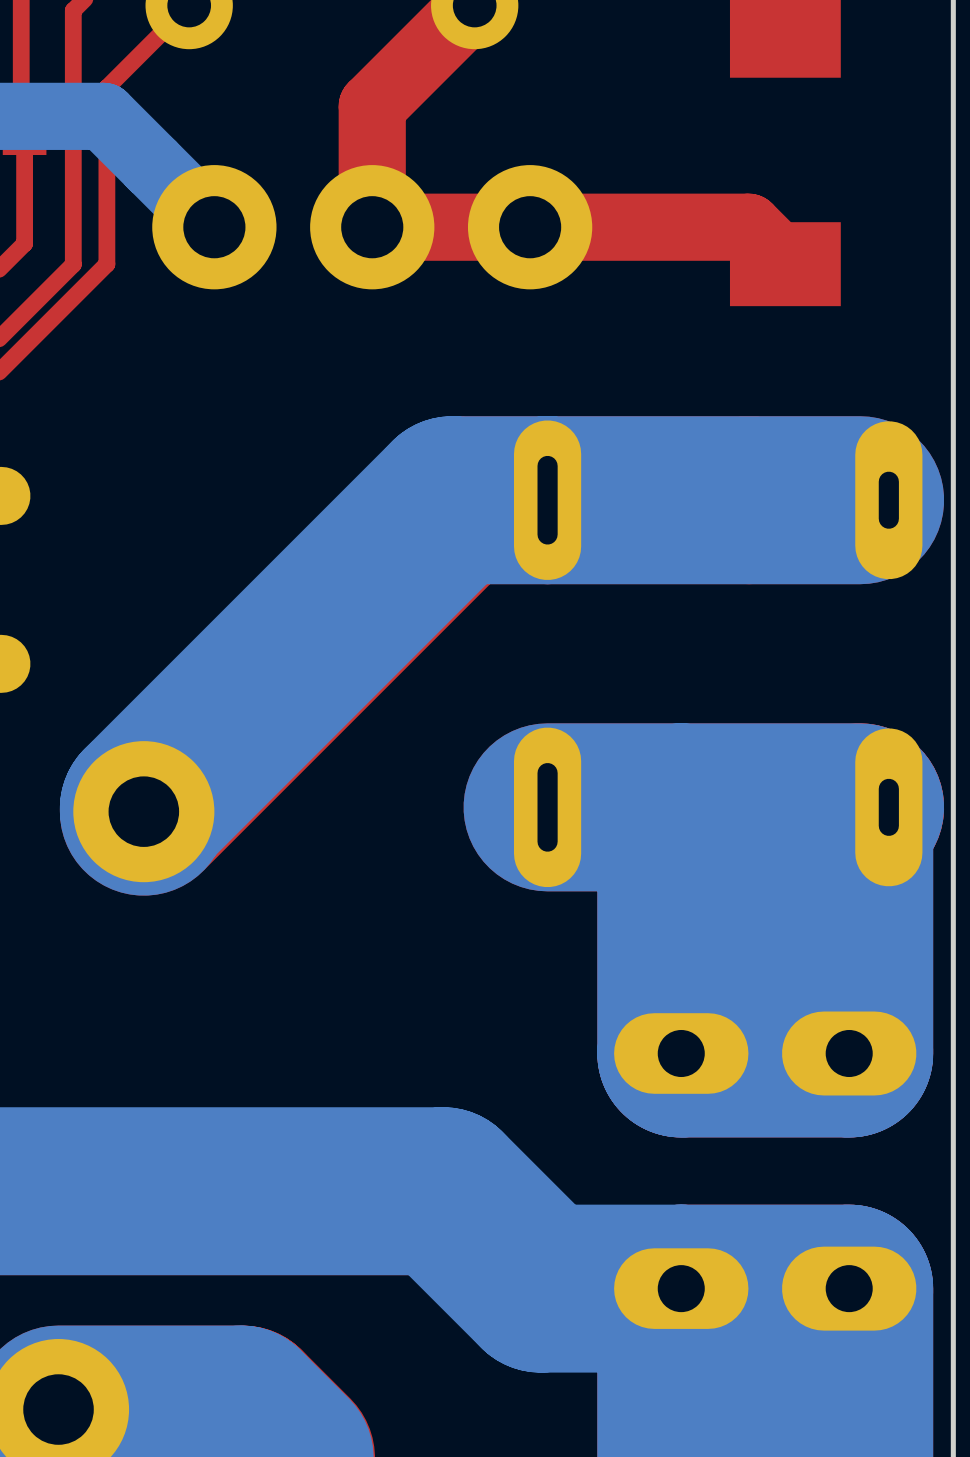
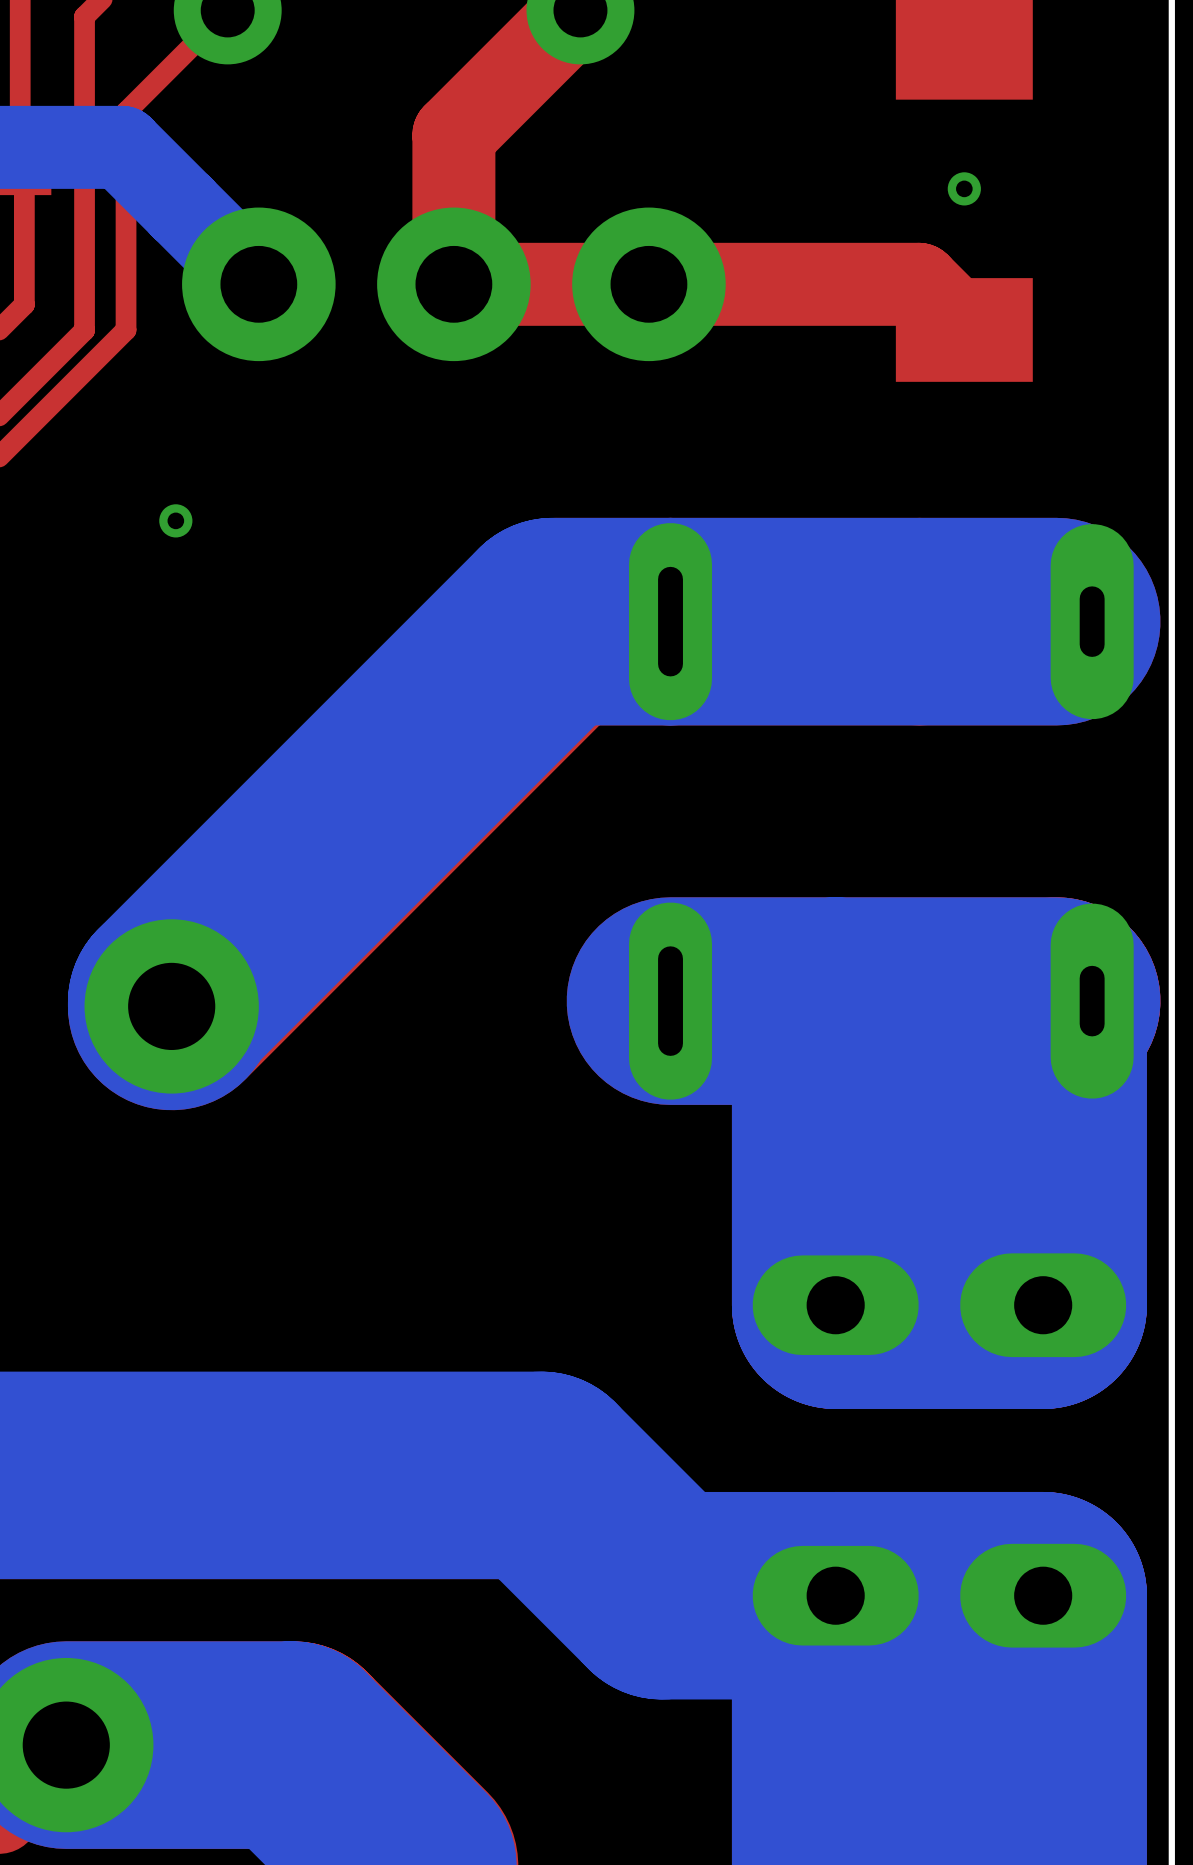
via: none -> (964, 188)
via: none -> (175, 520)

